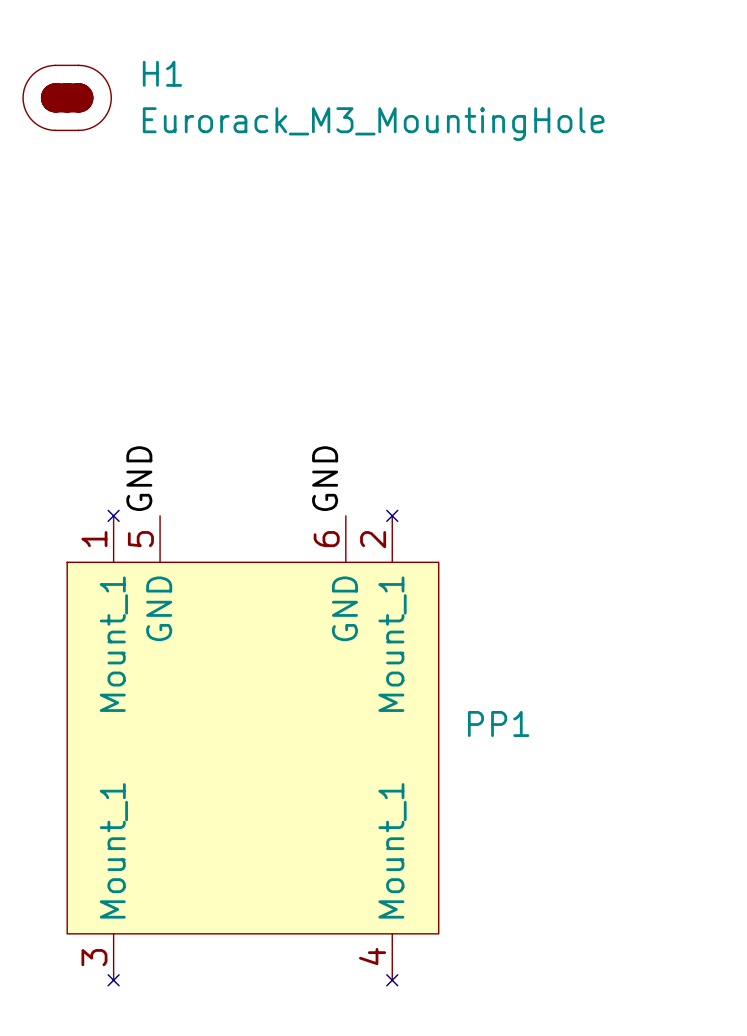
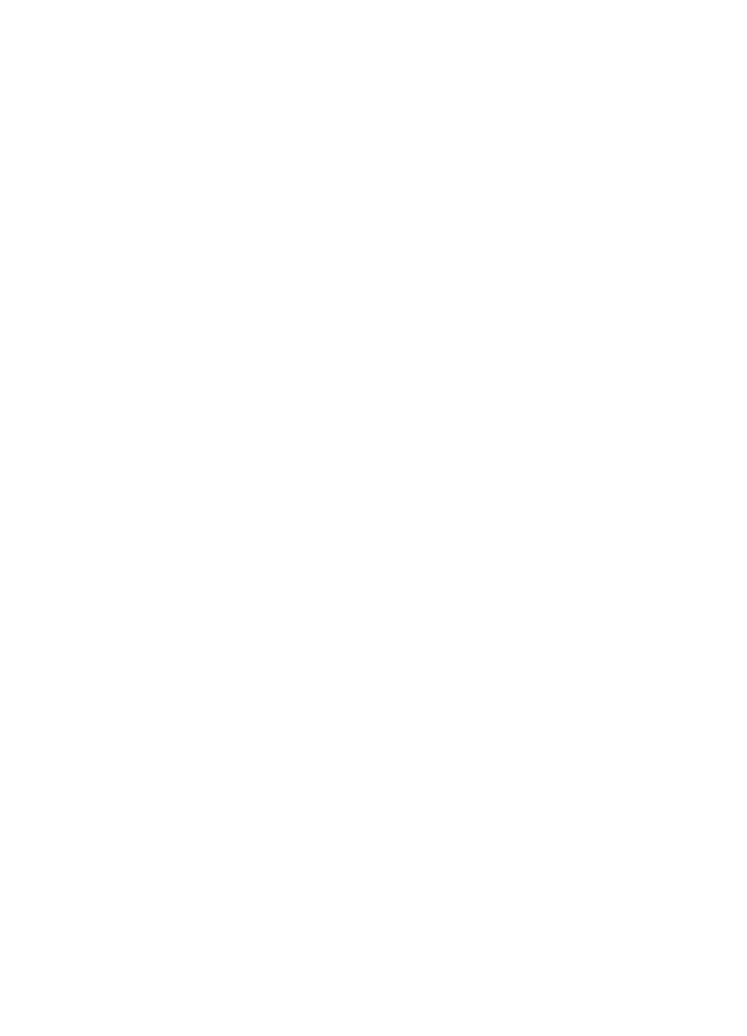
H1: Eurorack_M3_MountingHole (67, 97) -> none
label: GND (139, 478) -> none
label: GND (325, 478) -> none
PP1: (252, 748) -> none

